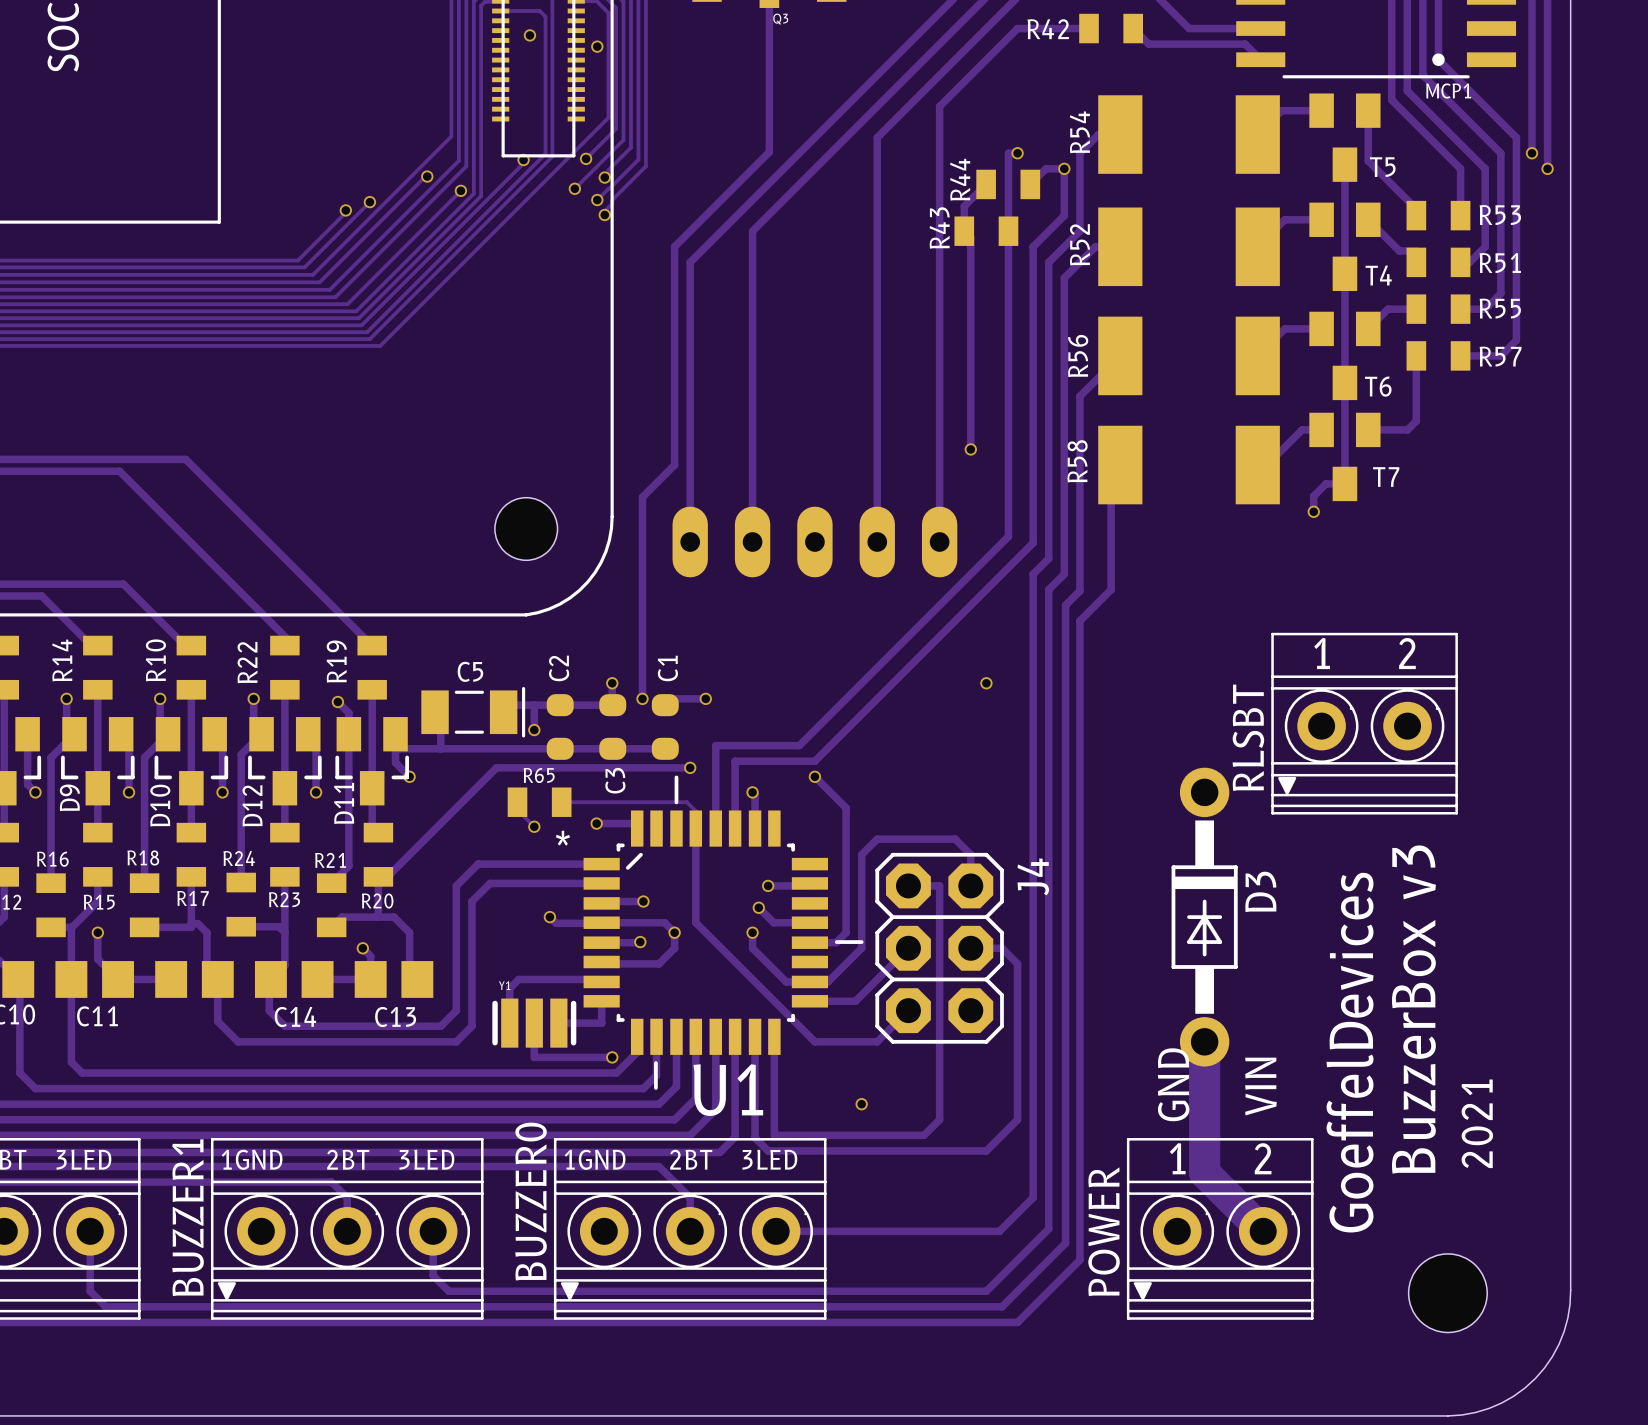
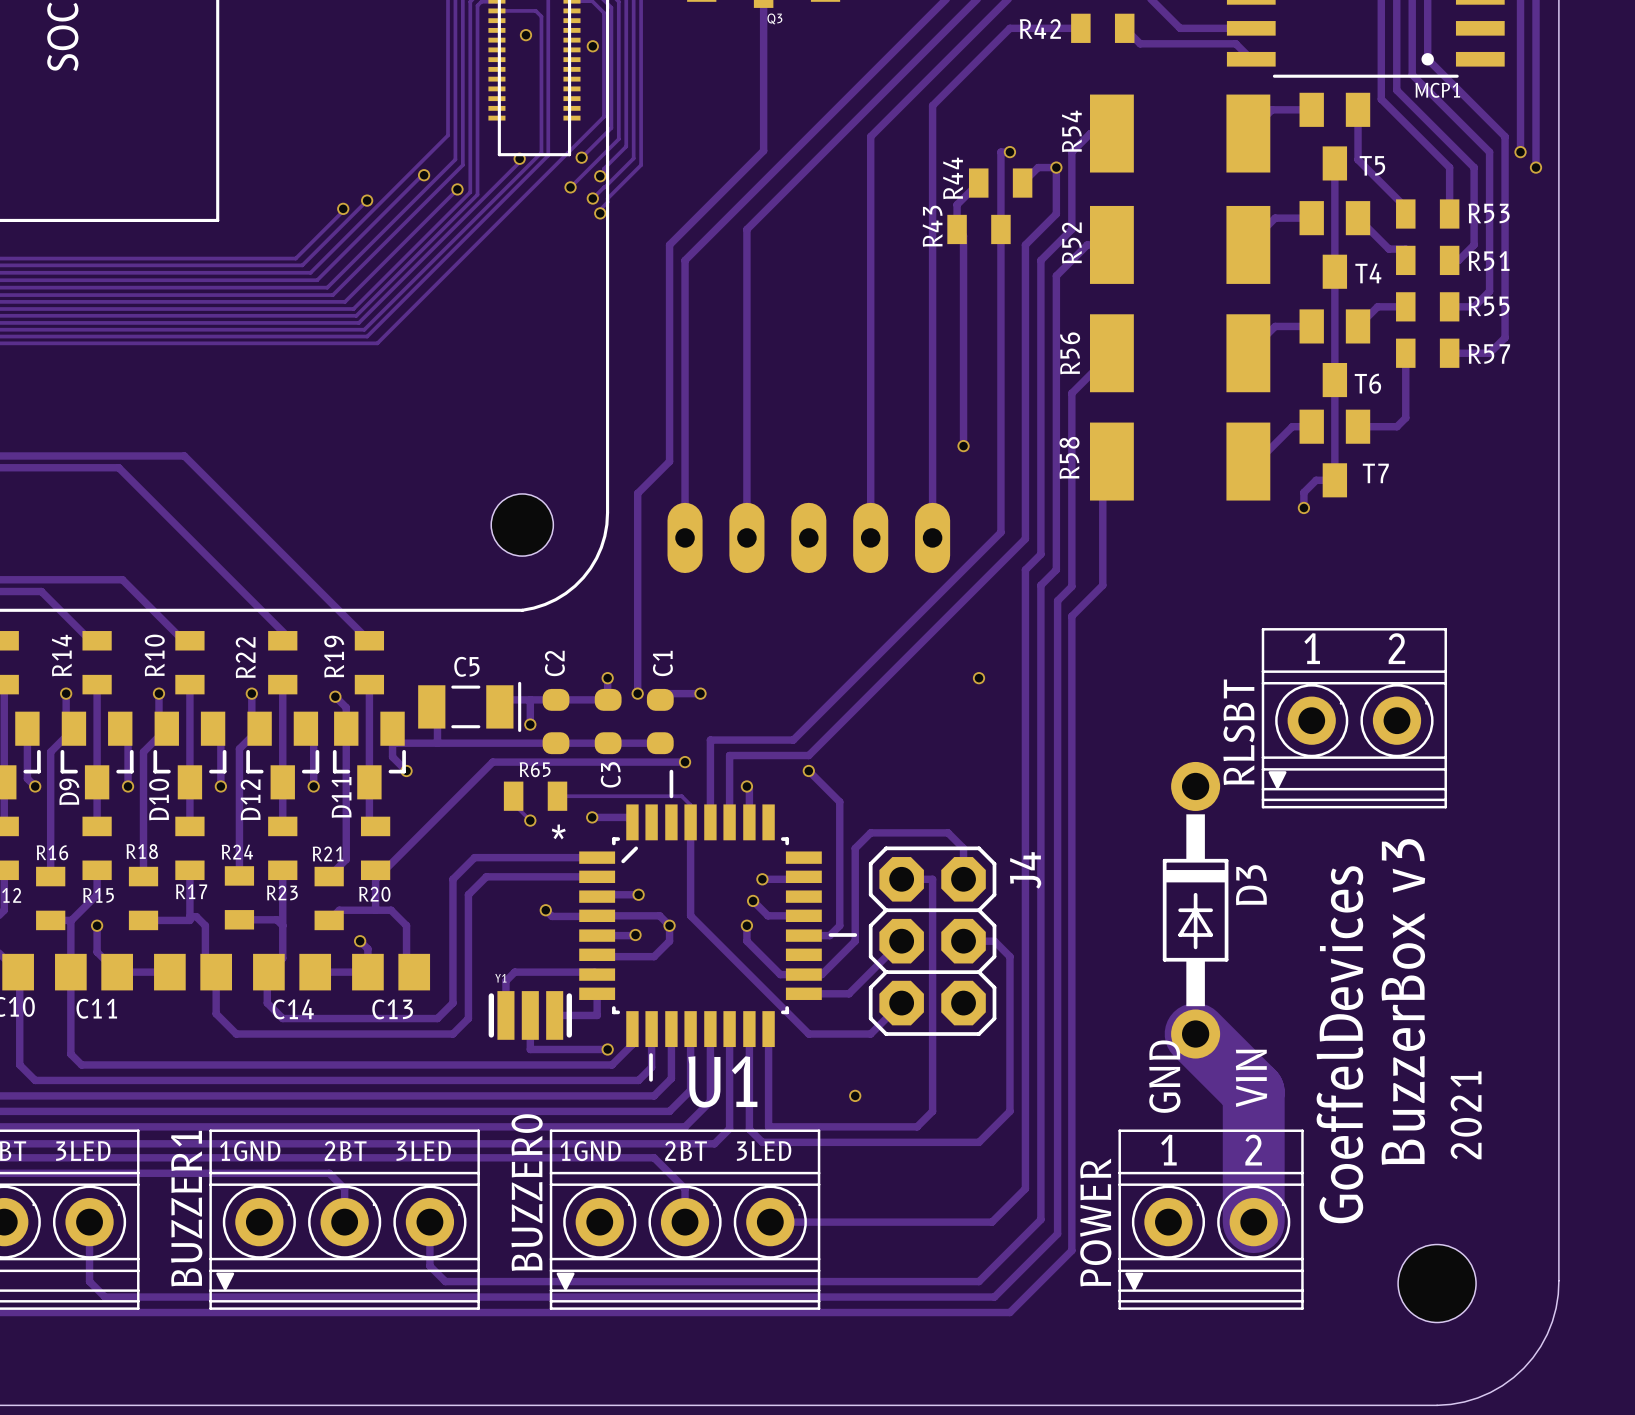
track: (1204, 1041) (1204, 1172) (1263, 1231) -> (1195, 1034) (1253, 1092) (1253, 1222)

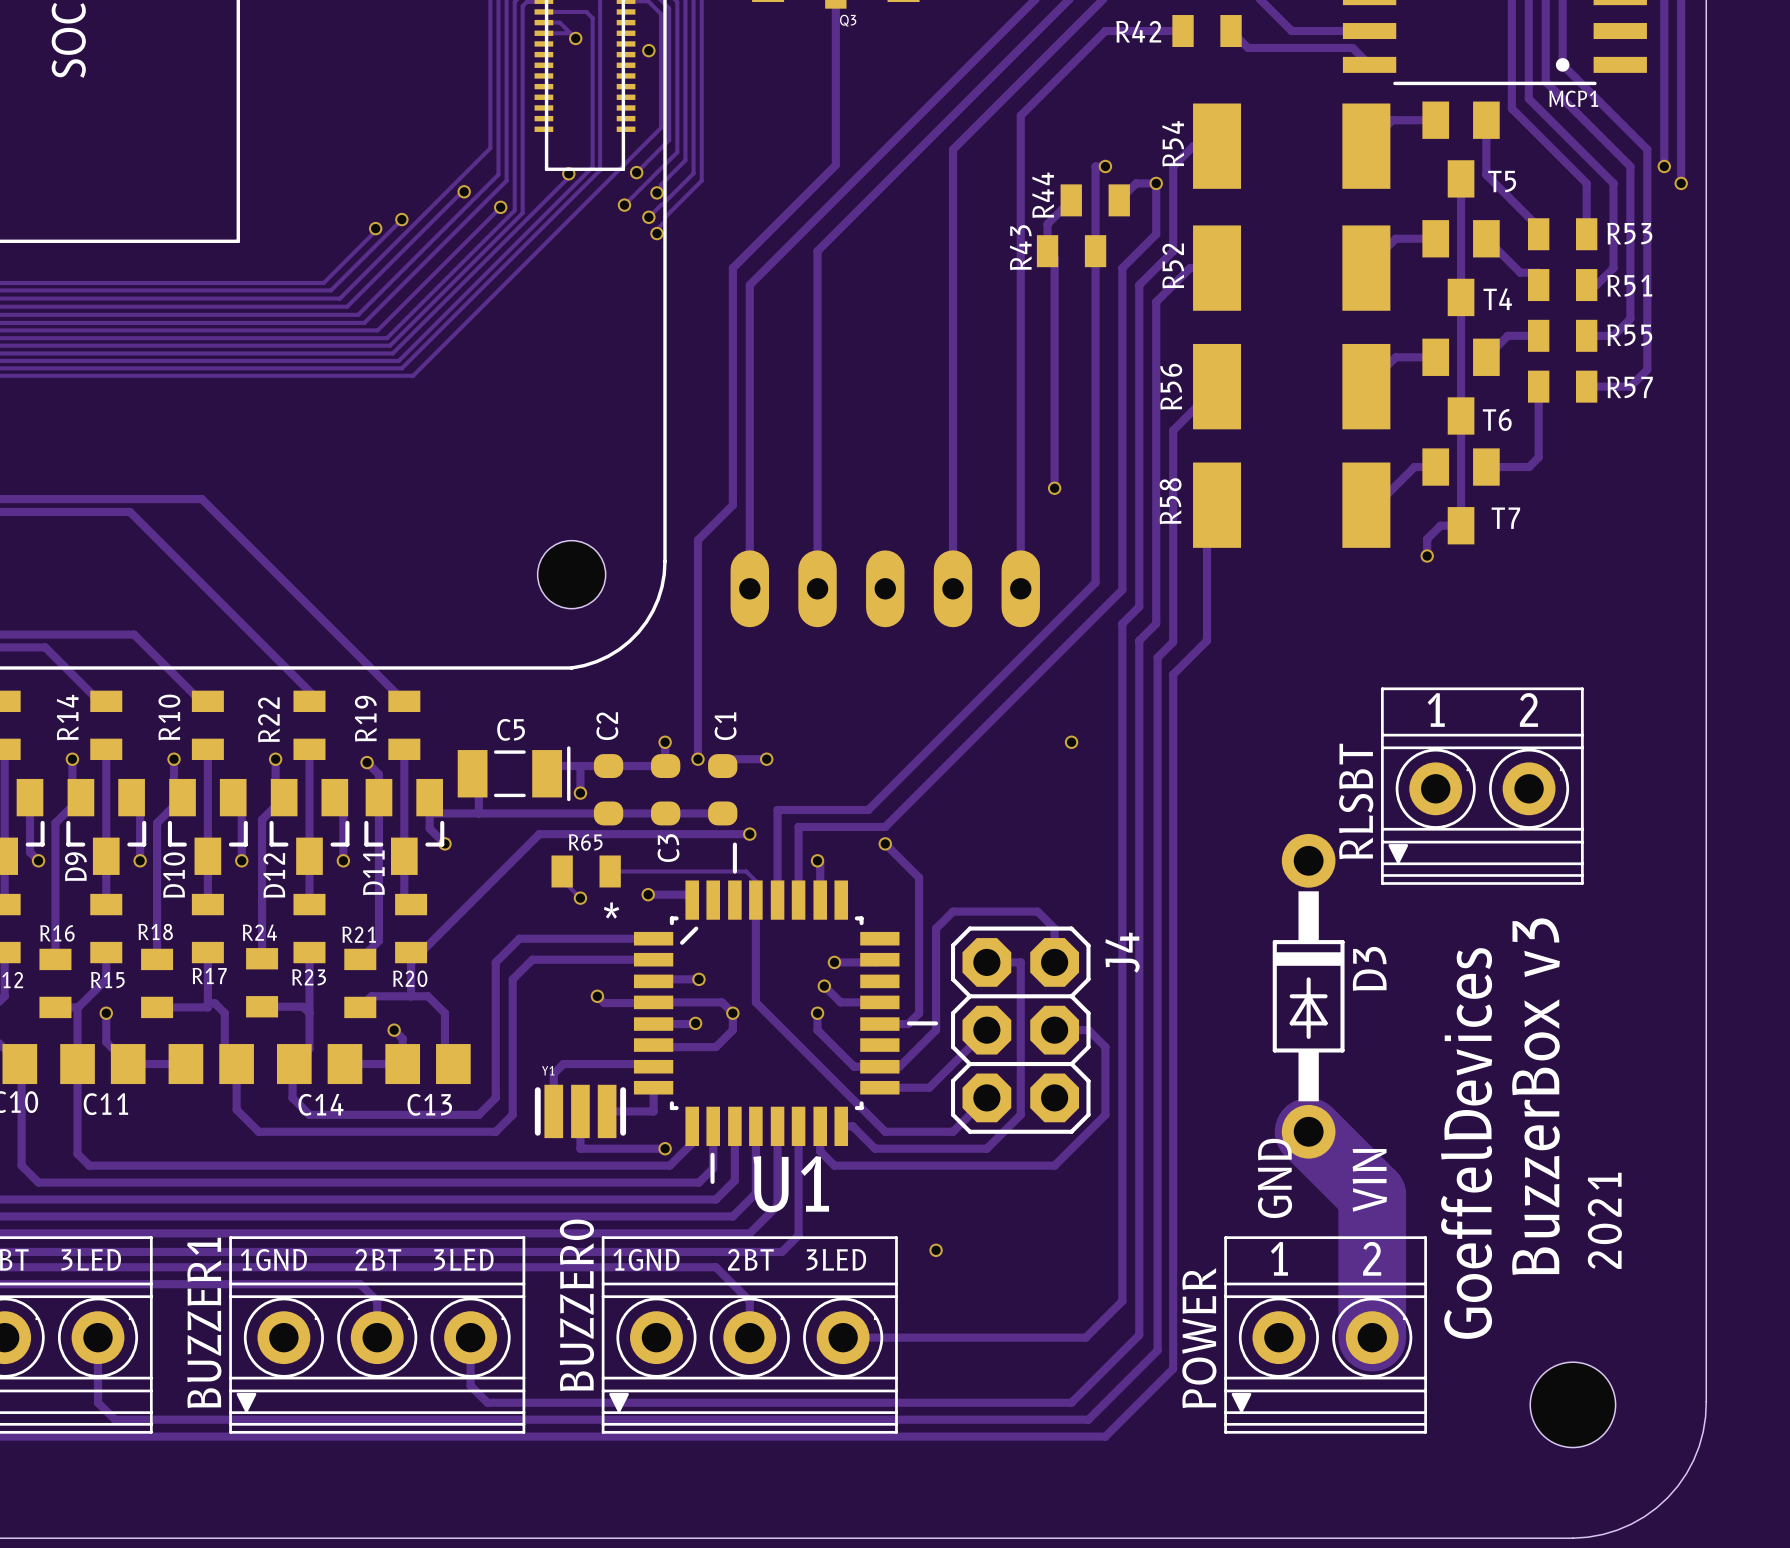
track: none -> (543, 22) (559, 22) (575, 38)
track: none -> (543, 33) (570, 33)
track: (932, 1018) (932, 1111) (917, 1126) (768, 1126) (768, 1029) -> (1020, 1114) (986, 1148) (875, 1148) (852, 1126) (841, 1126)
track: (1009, 1018) (1009, 1111) (979, 1142) (762, 1142) (749, 1129) (749, 1051) -> (1105, 1114) (1054, 1165) (834, 1165) (820, 1151)
via position: (855, 1095) -> (936, 1250)

